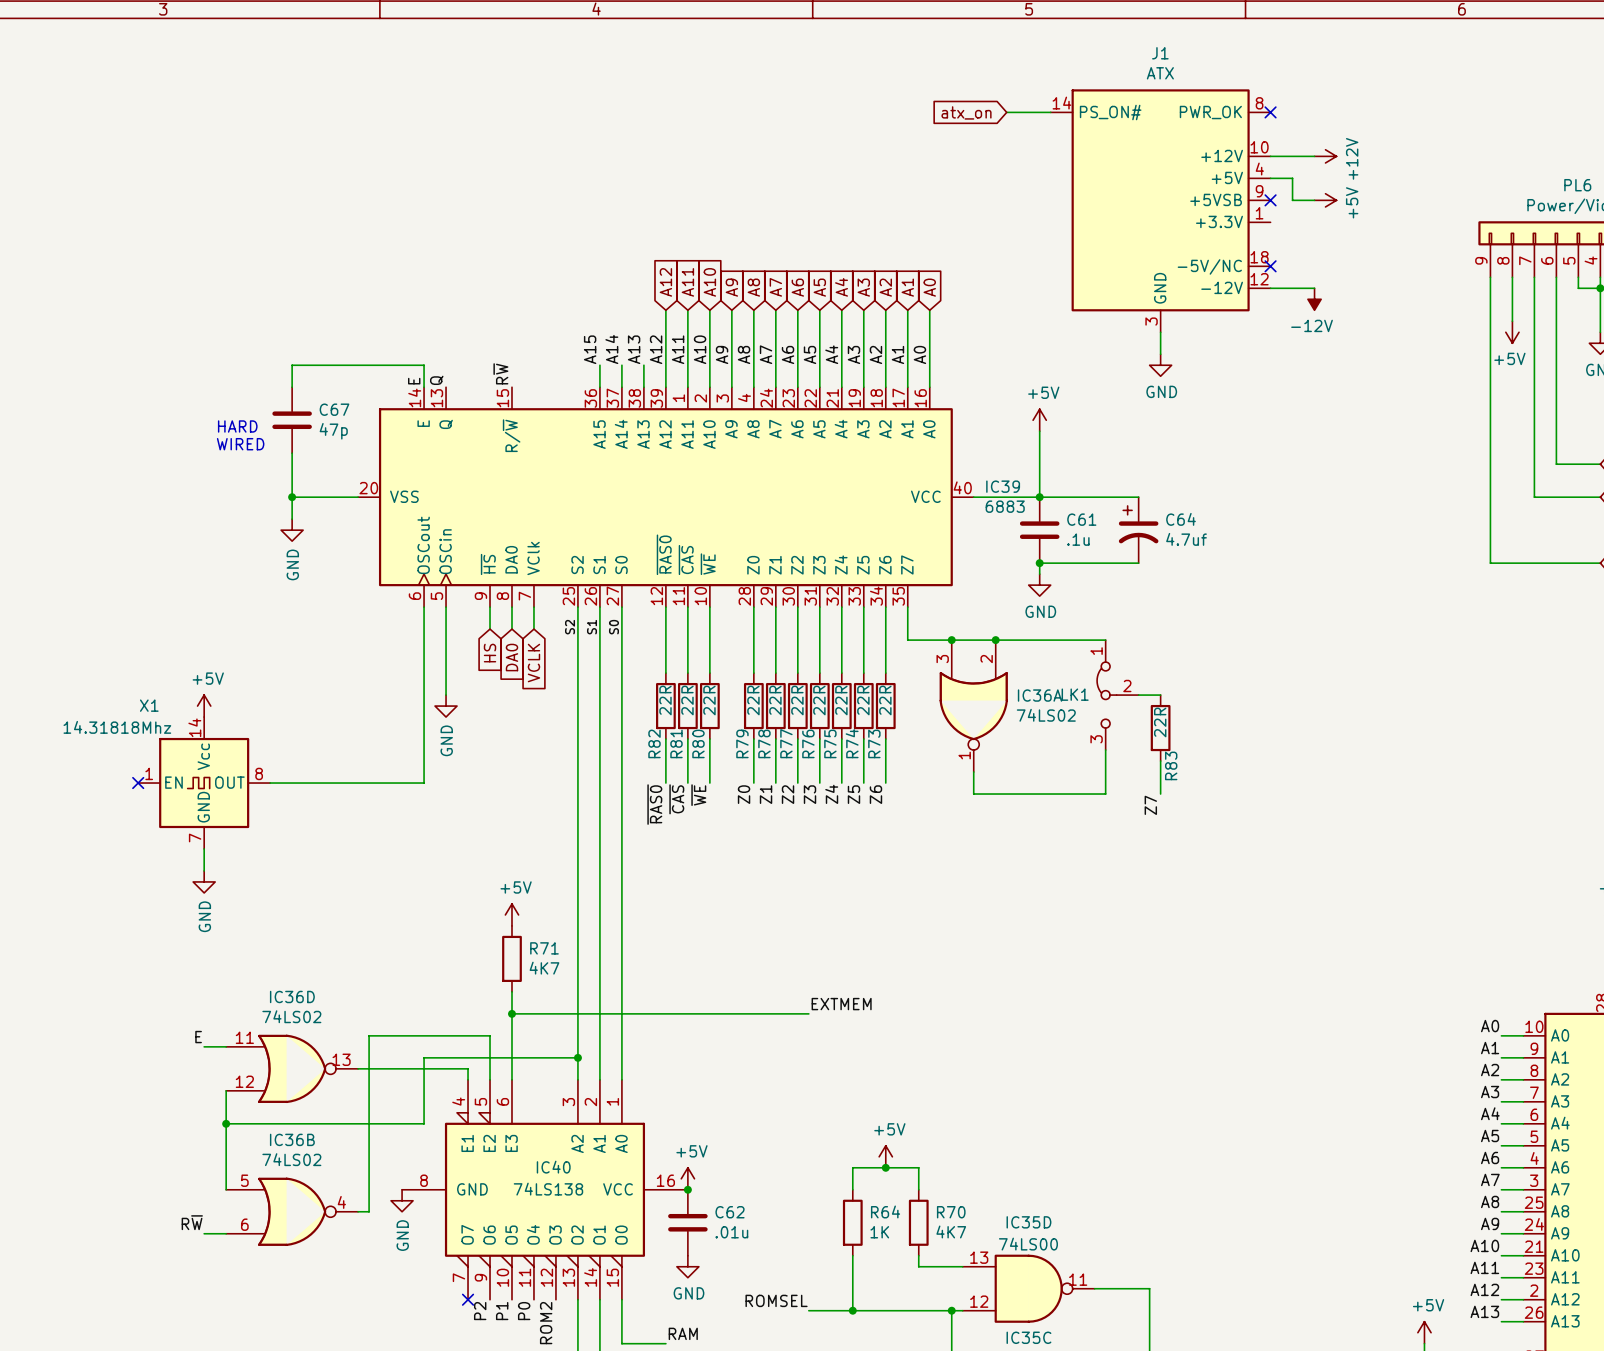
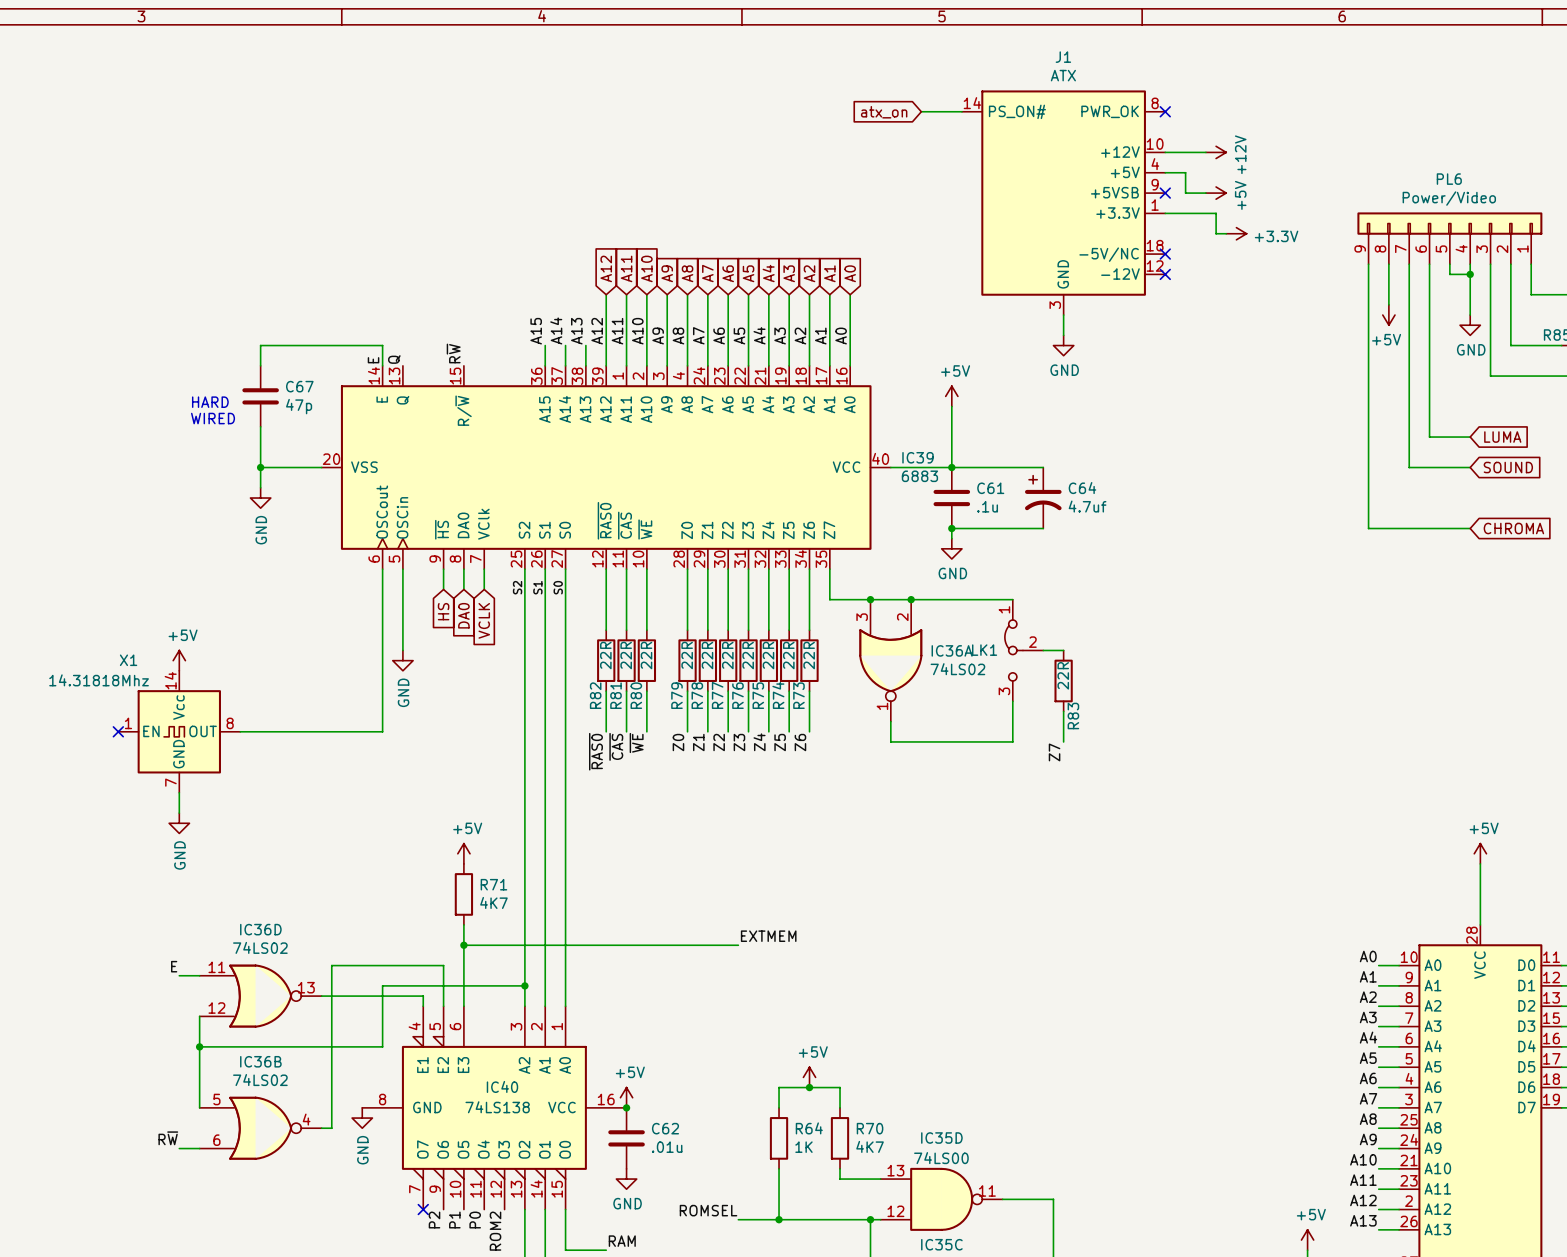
wire: none -> (1165, 213) (1216, 213) (1216, 233) (1226, 233)
power symbol: none -> +3.3V (1236, 233)
wire: (1270, 288) (1314, 288) -> none
no-connect mark: none -> (1165, 274)
power symbol: -12V (1314, 299) -> none

